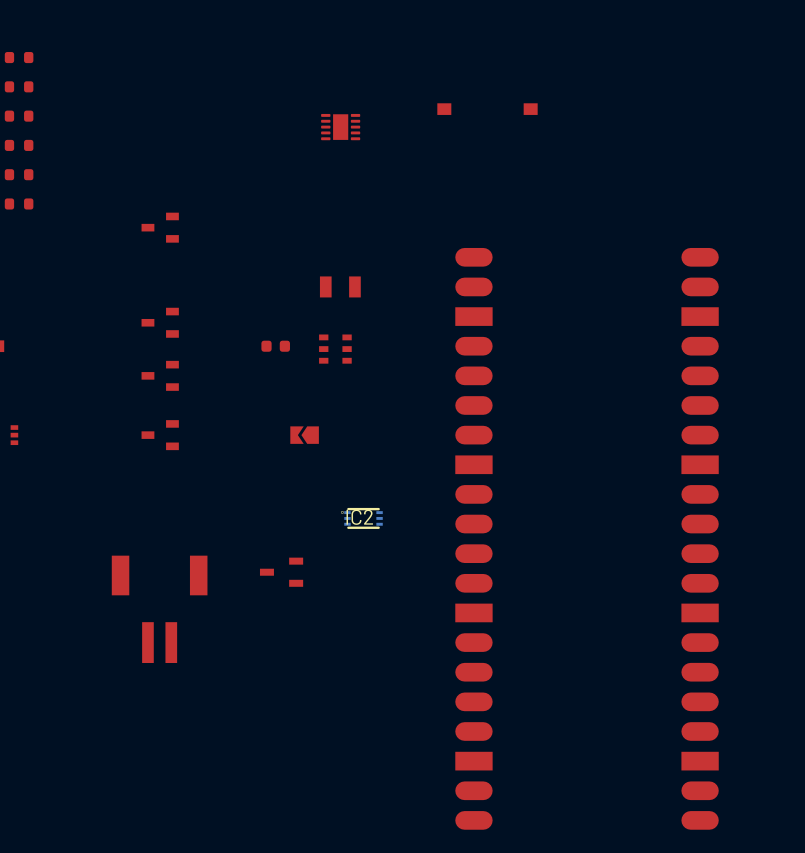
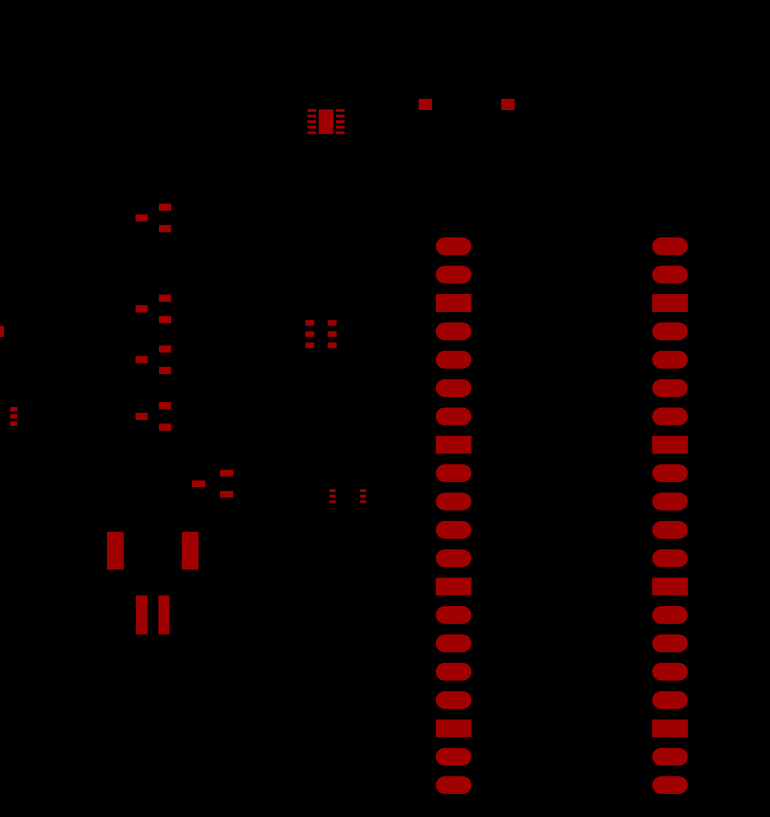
part: (19, 57) -> none
part: (19, 86) -> none
part: (19, 116) -> none
part: (19, 145) -> none
part: (19, 174) -> none
part: (19, 203) -> none
part: (340, 286) -> none
part: (275, 346) -> none
part: (304, 435) -> none
IC2 side: bottom (361, 518) -> top (347, 496)
part position: (281, 572) -> (212, 483)

